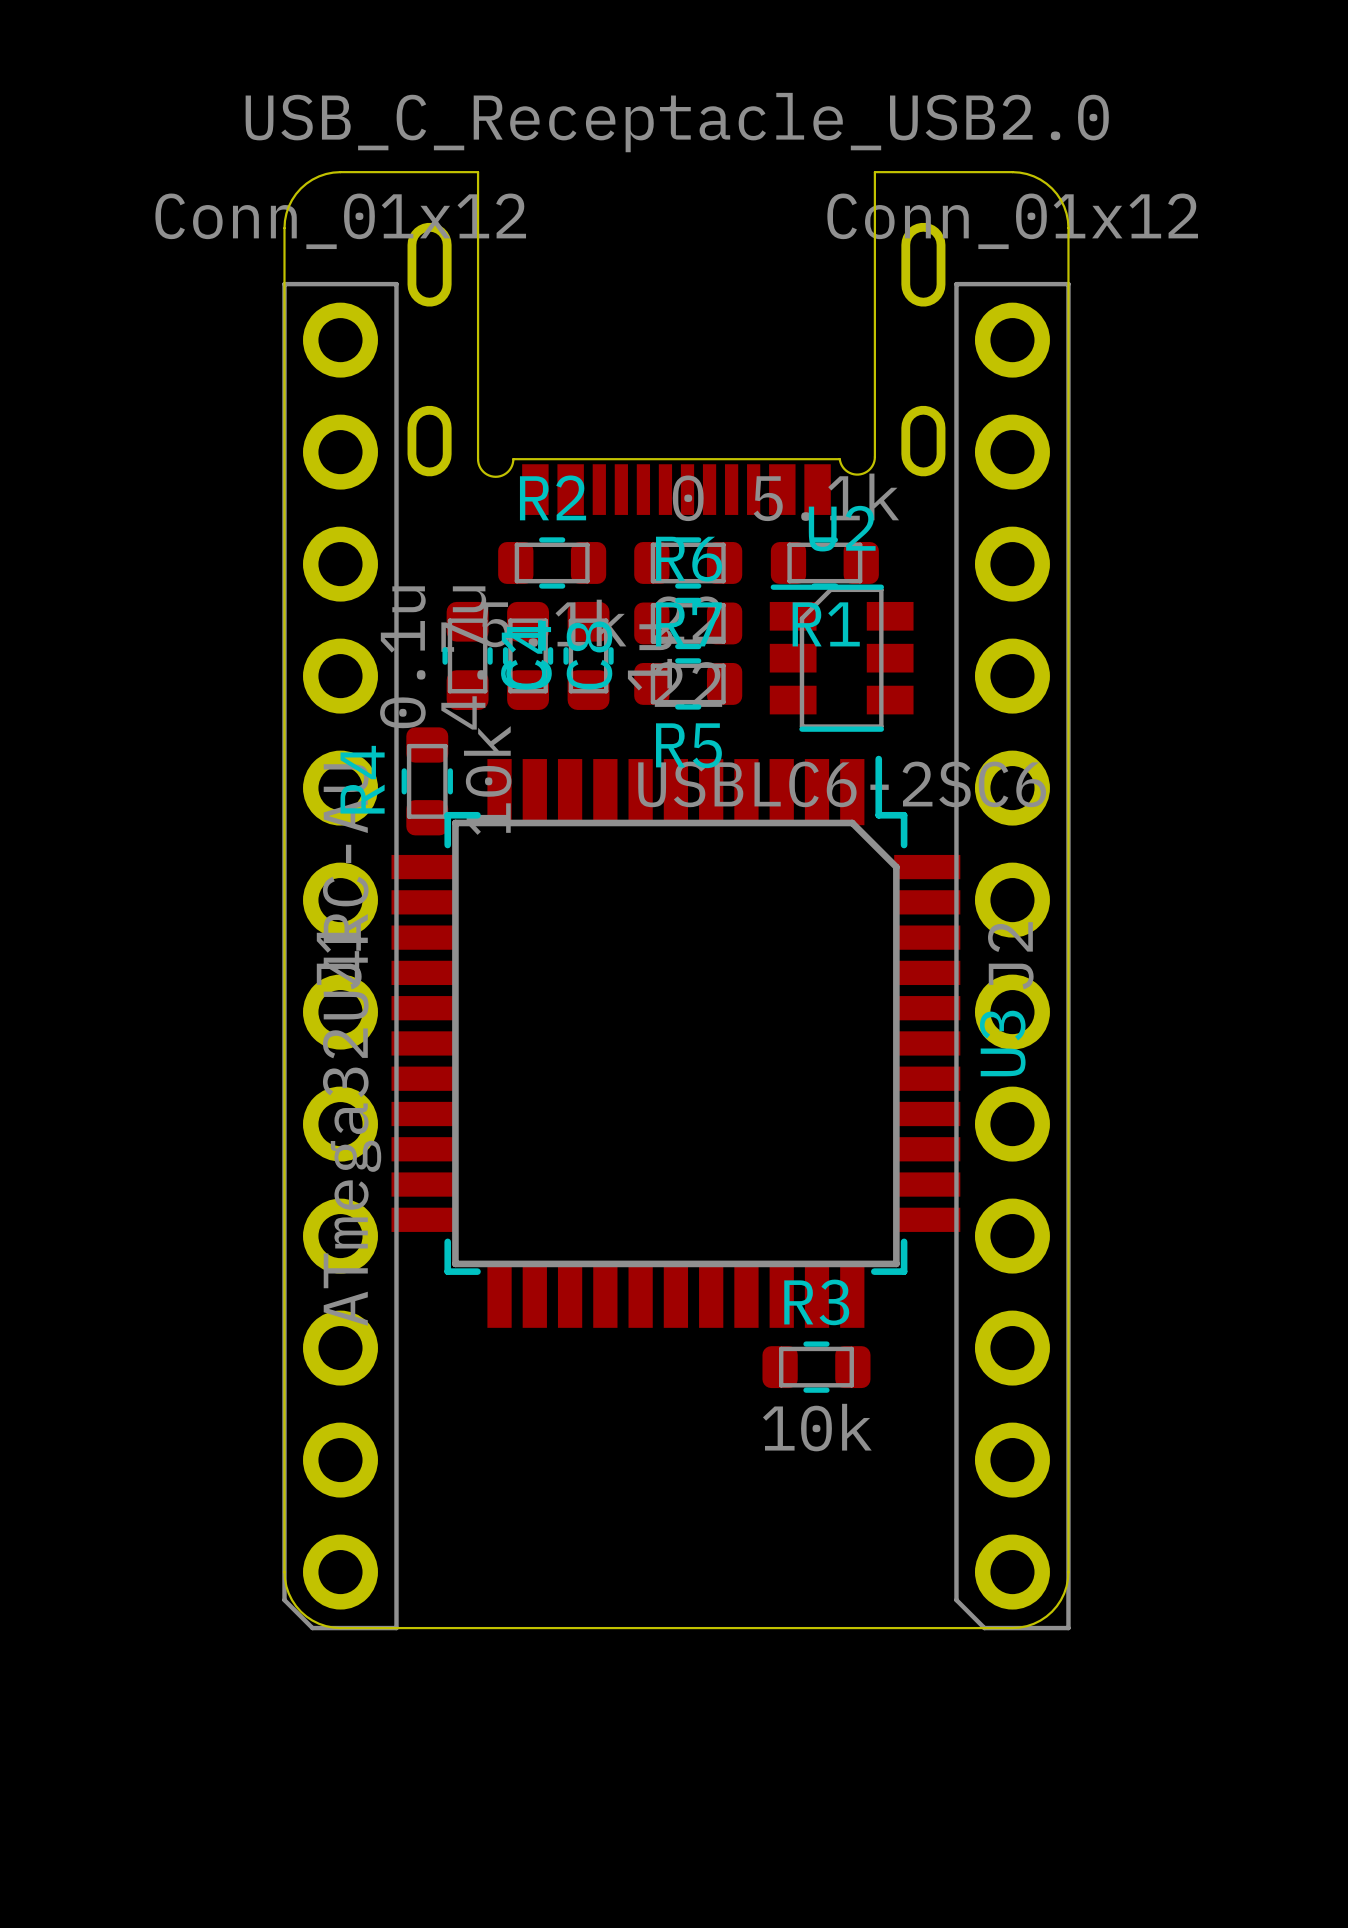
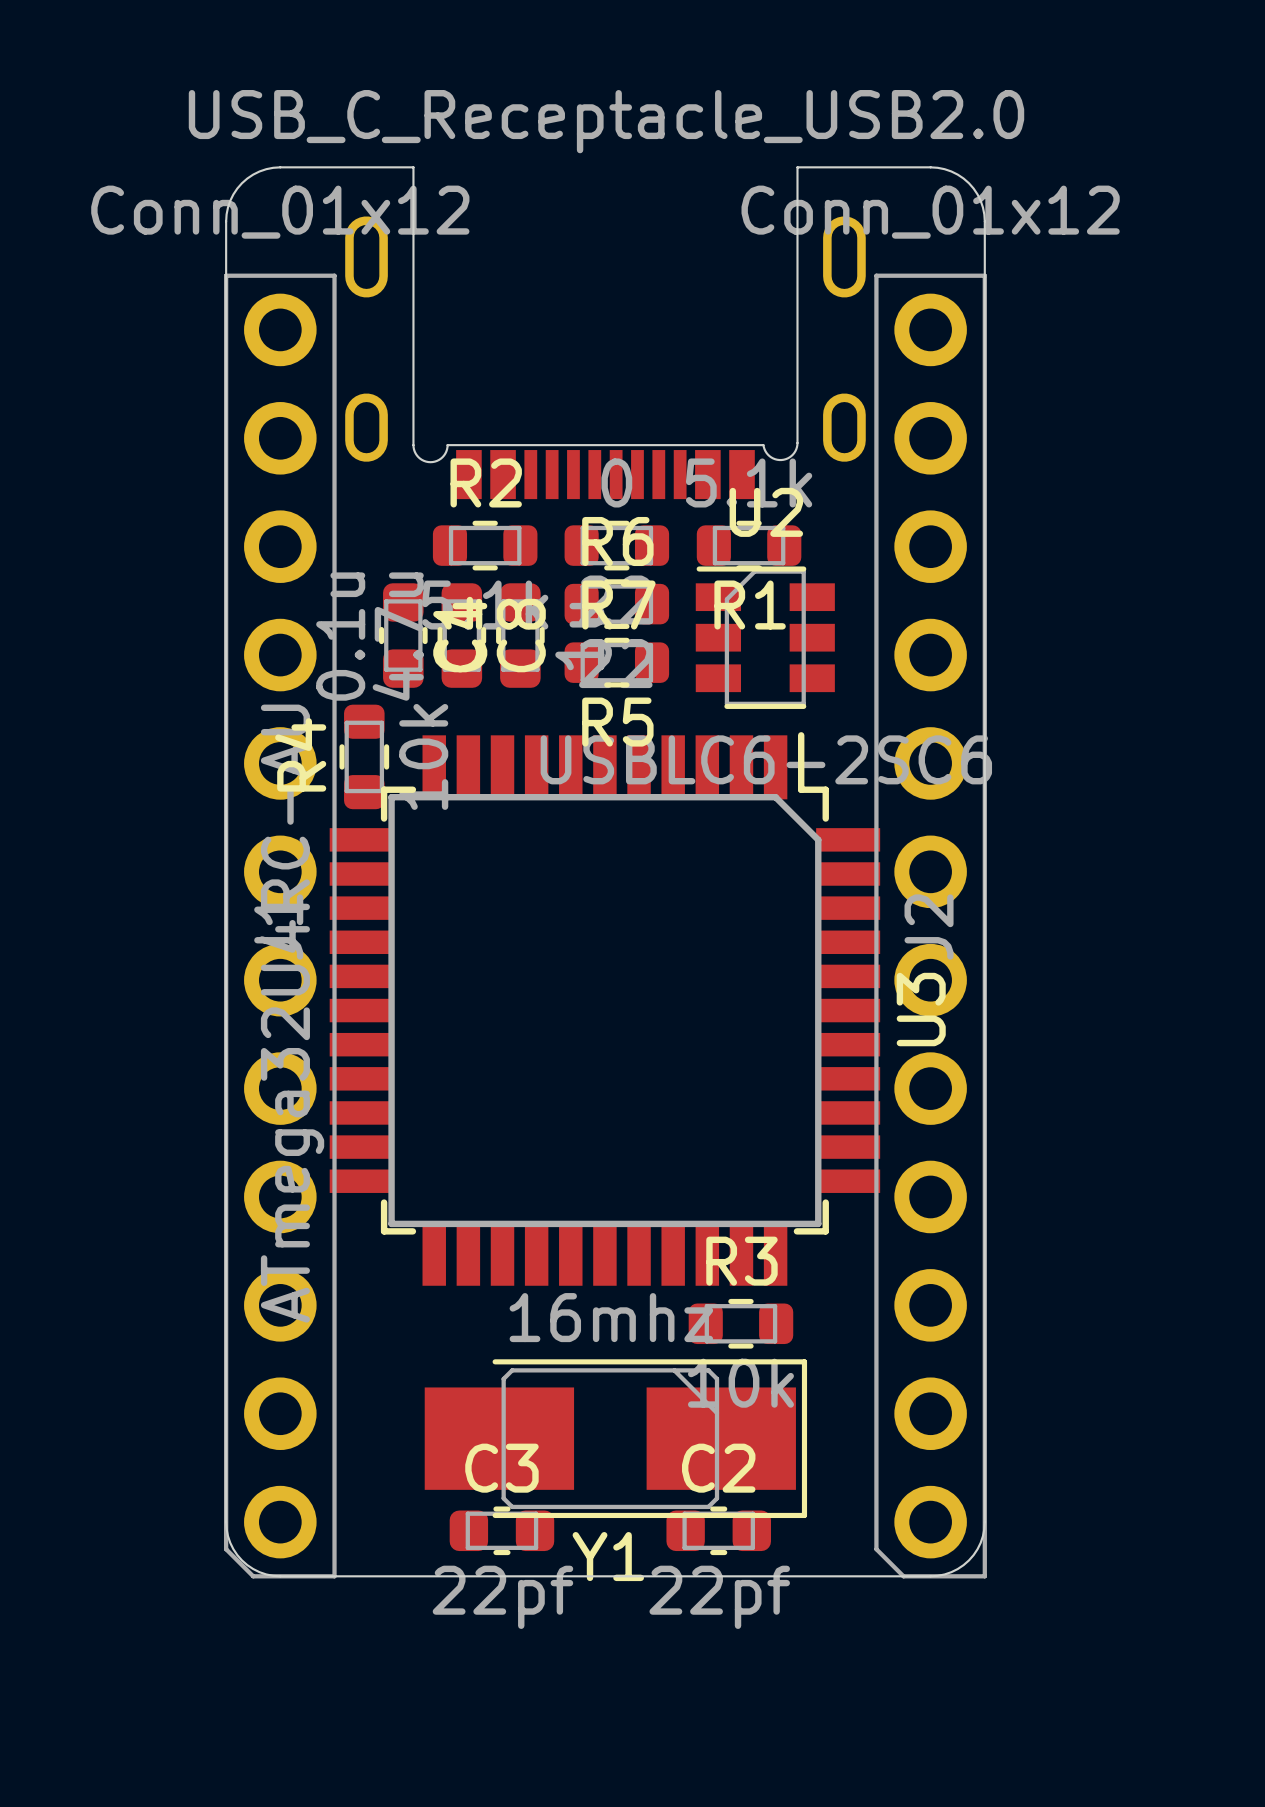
Y1: none -> 16mhz (615, 1438)
C3: none -> 22pf (501, 1530)
C2: none -> 22pf (718, 1530)

